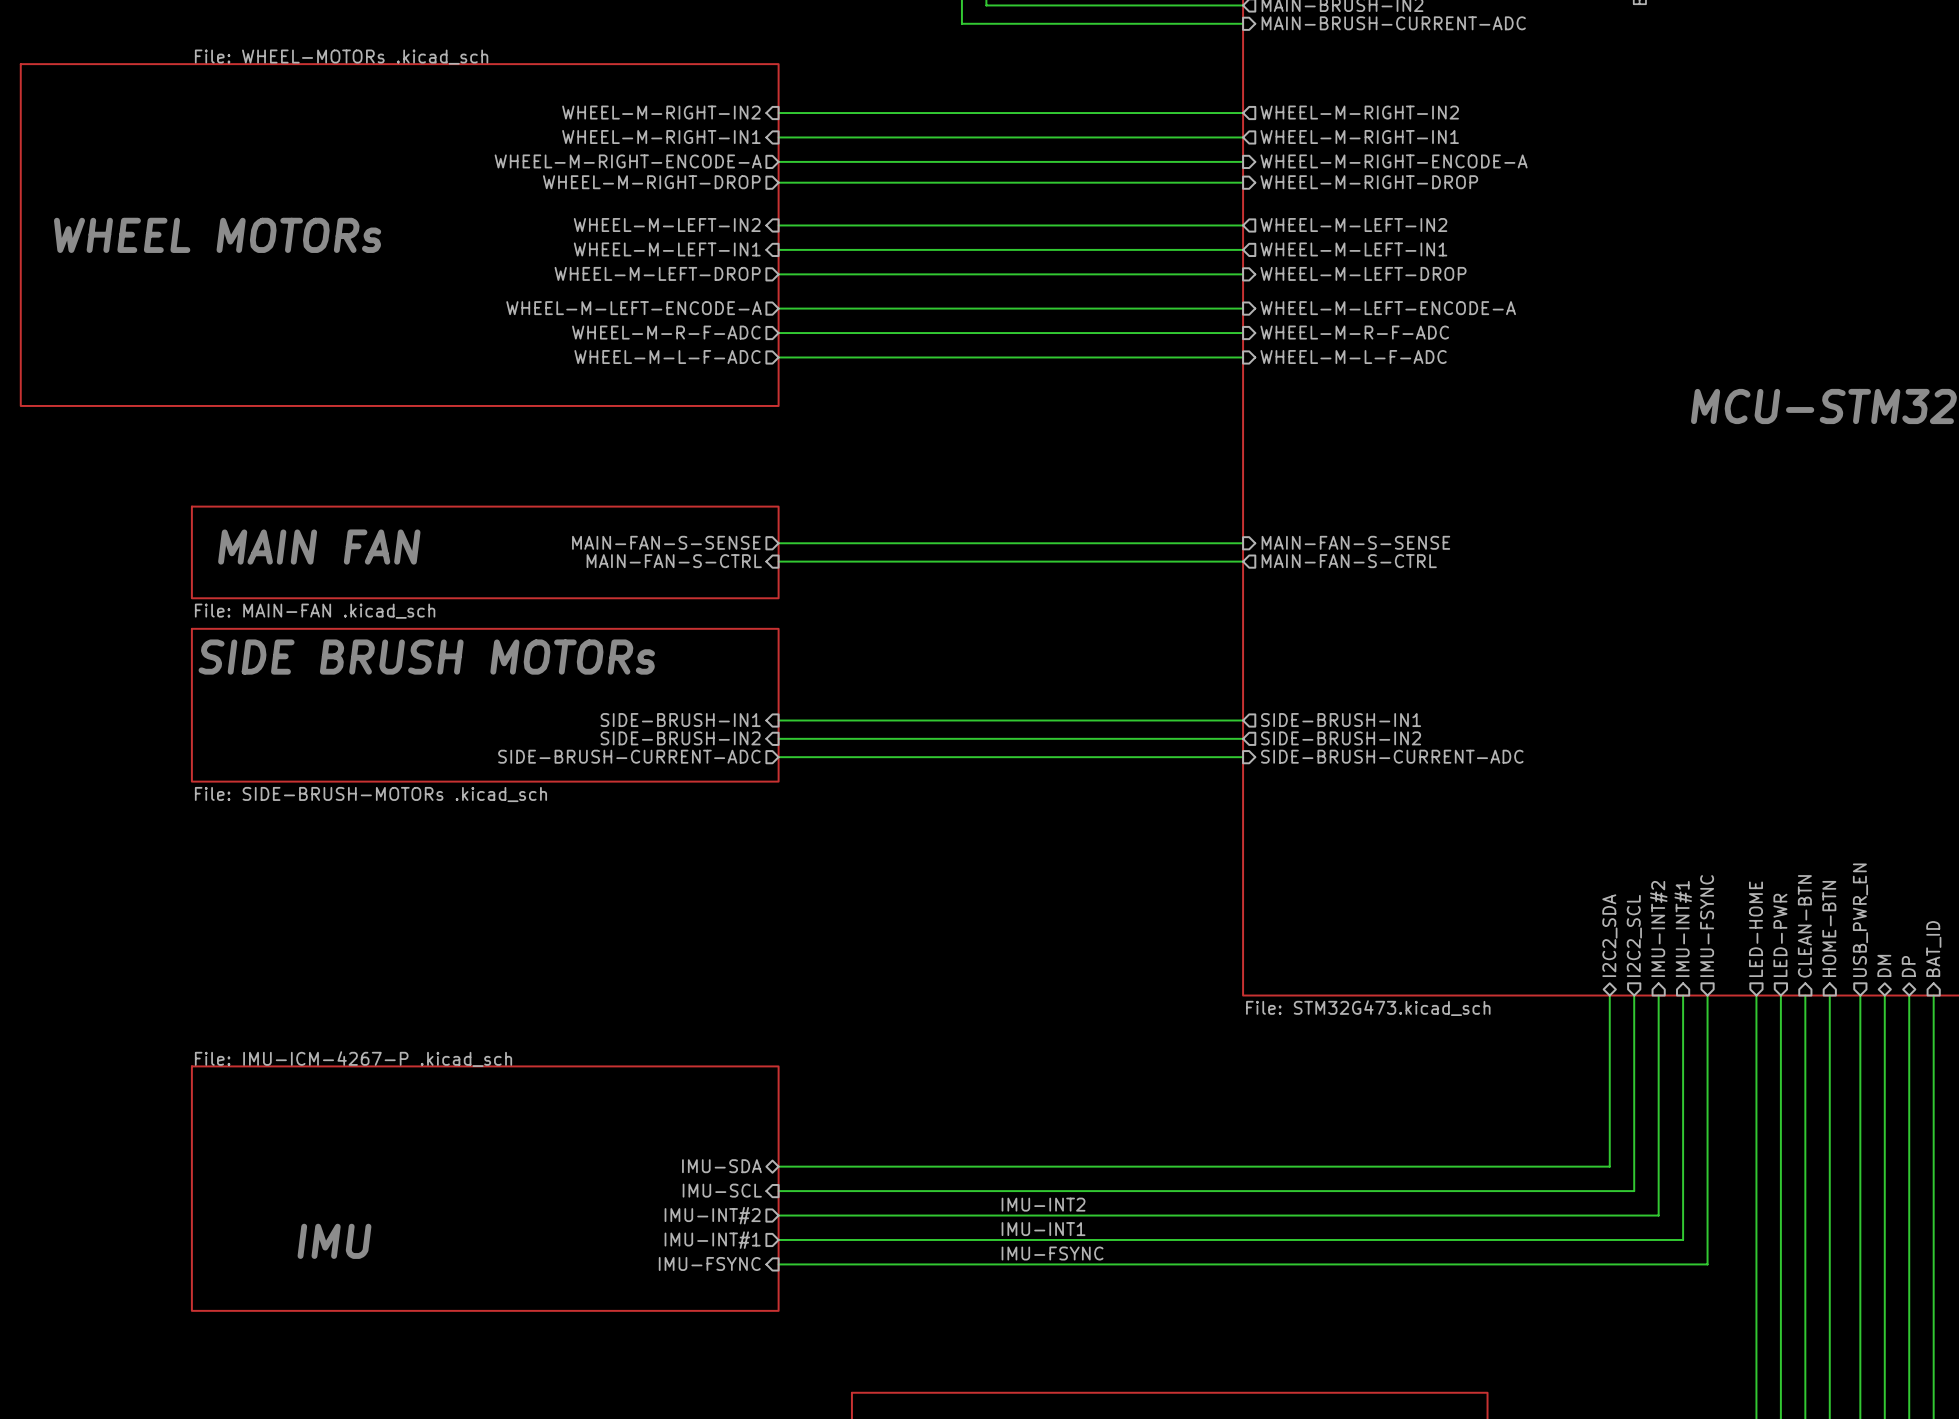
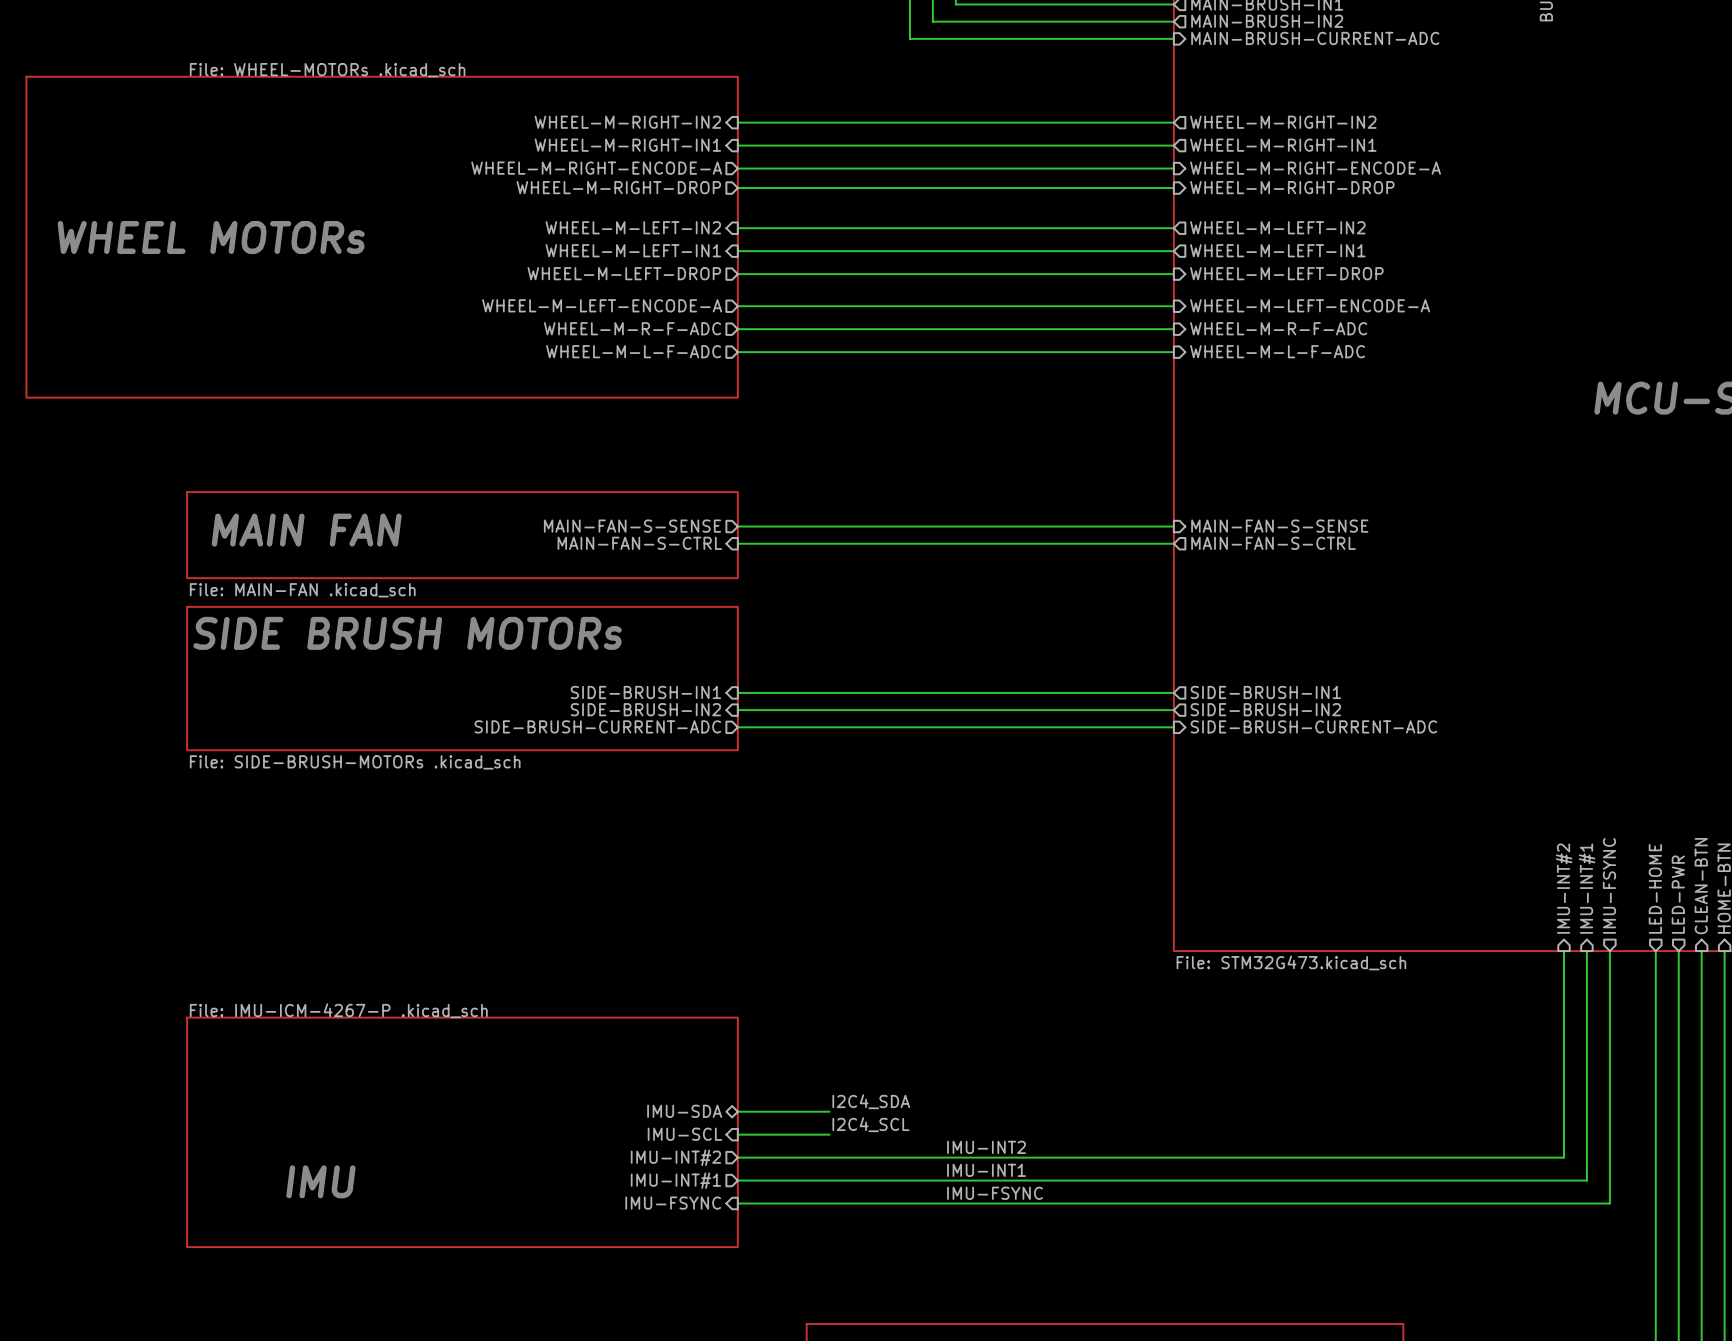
sheet pin: I2C2_SDA (1609, 935) -> none
sheet pin: I2C2_SCL (1634, 935) -> none
wire: (1609, 995) (1609, 1166) (876, 1166) -> none
wire: (1634, 995) (1634, 1191) (876, 1191) -> none
label: none -> I2C4_SDA (871, 1101)
label: none -> I2C4_SCL (870, 1124)

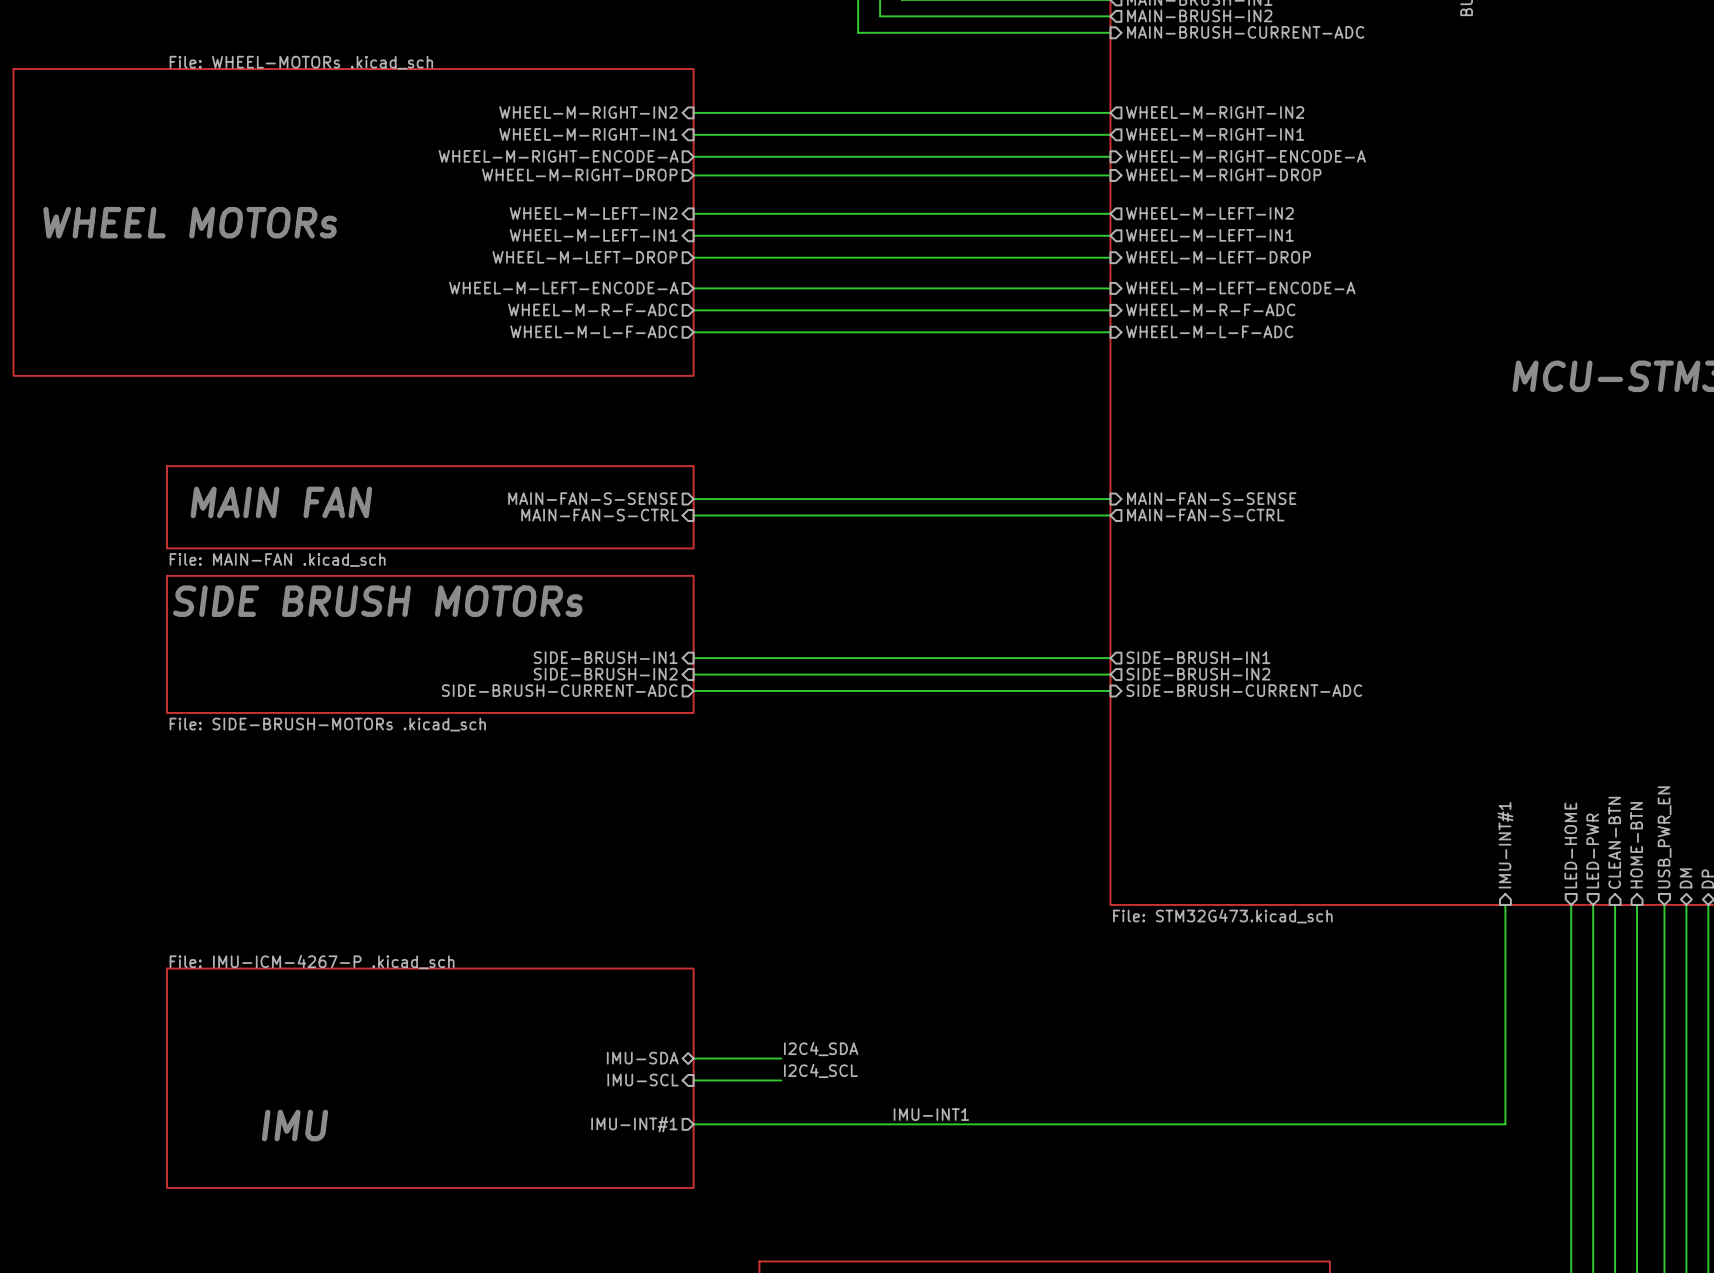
sheet pin: IMU-FSYNC (1609, 885) -> none
sheet pin: IMU-INT#2 (1564, 888) -> none
wire: (1563, 951) (1563, 1157) (737, 1157) -> none
wire: (1609, 951) (1609, 1203) (737, 1203) -> none
label: IMU-INT2 (986, 1147) -> none
sheet pin: IMU-INT#2 (675, 1157) -> none
label: IMU-FSYNC (995, 1193) -> none
sheet pin: IMU-FSYNC (673, 1203) -> none

